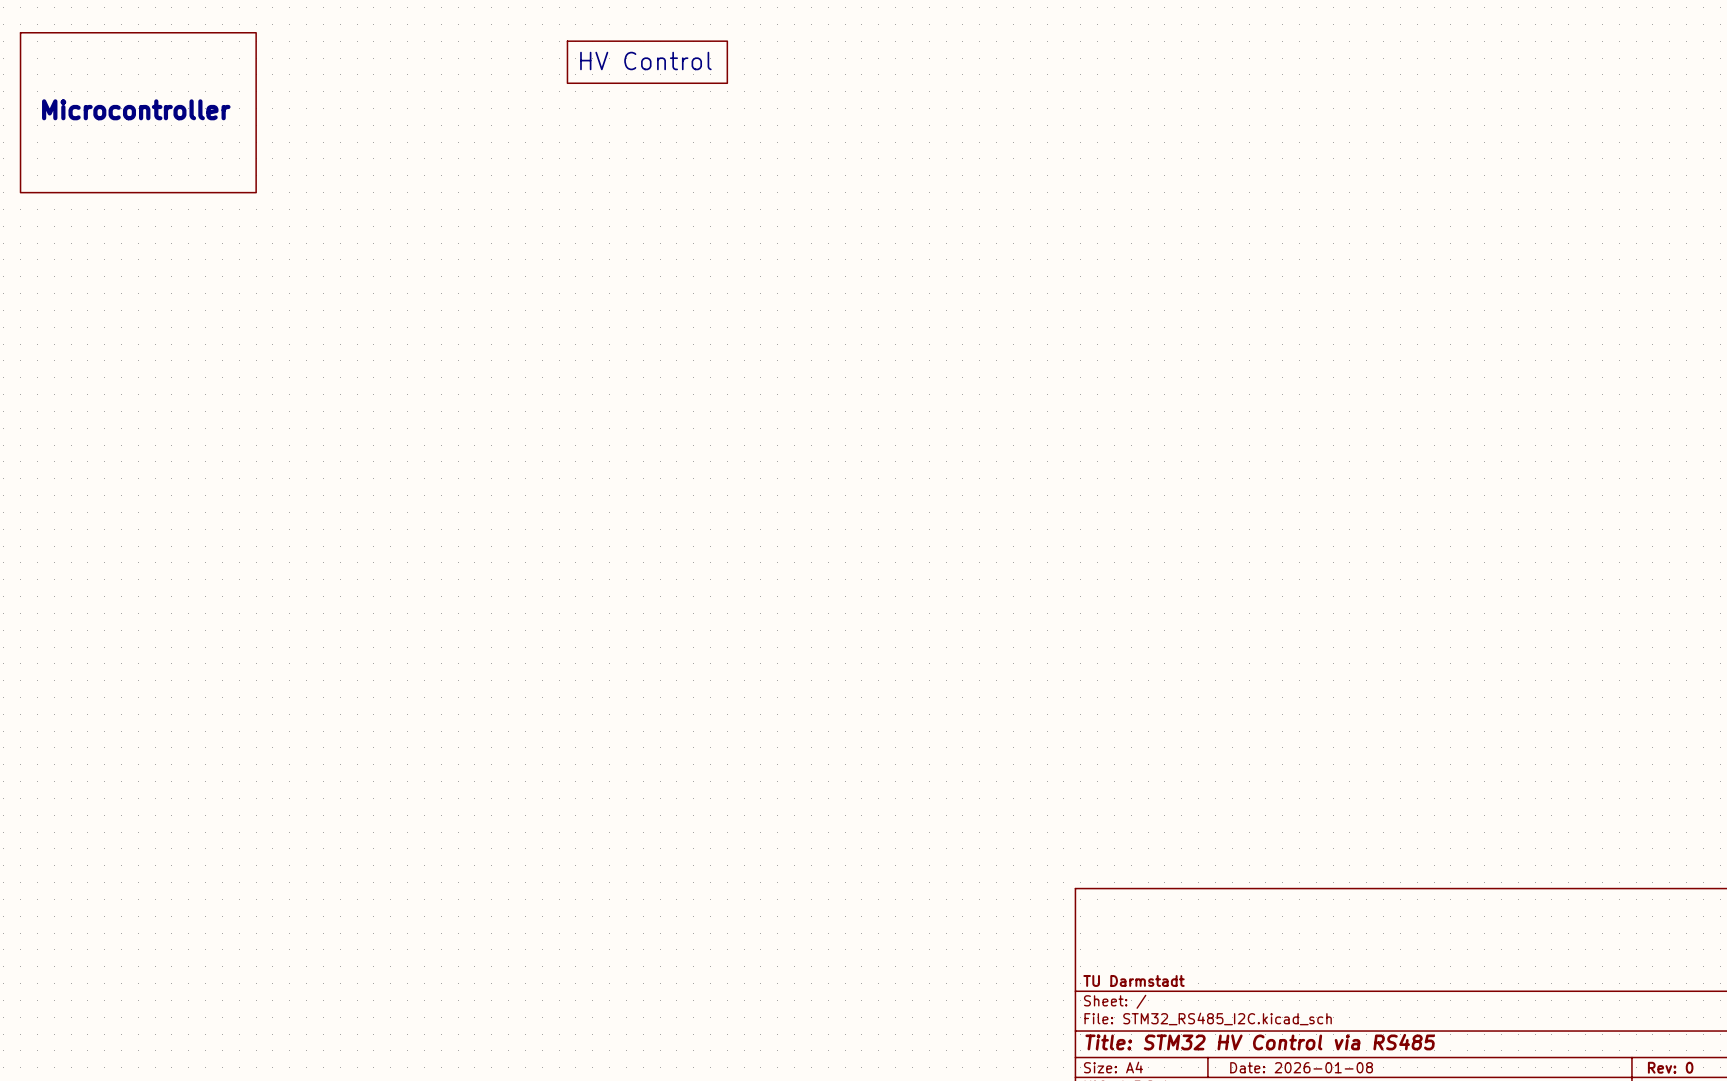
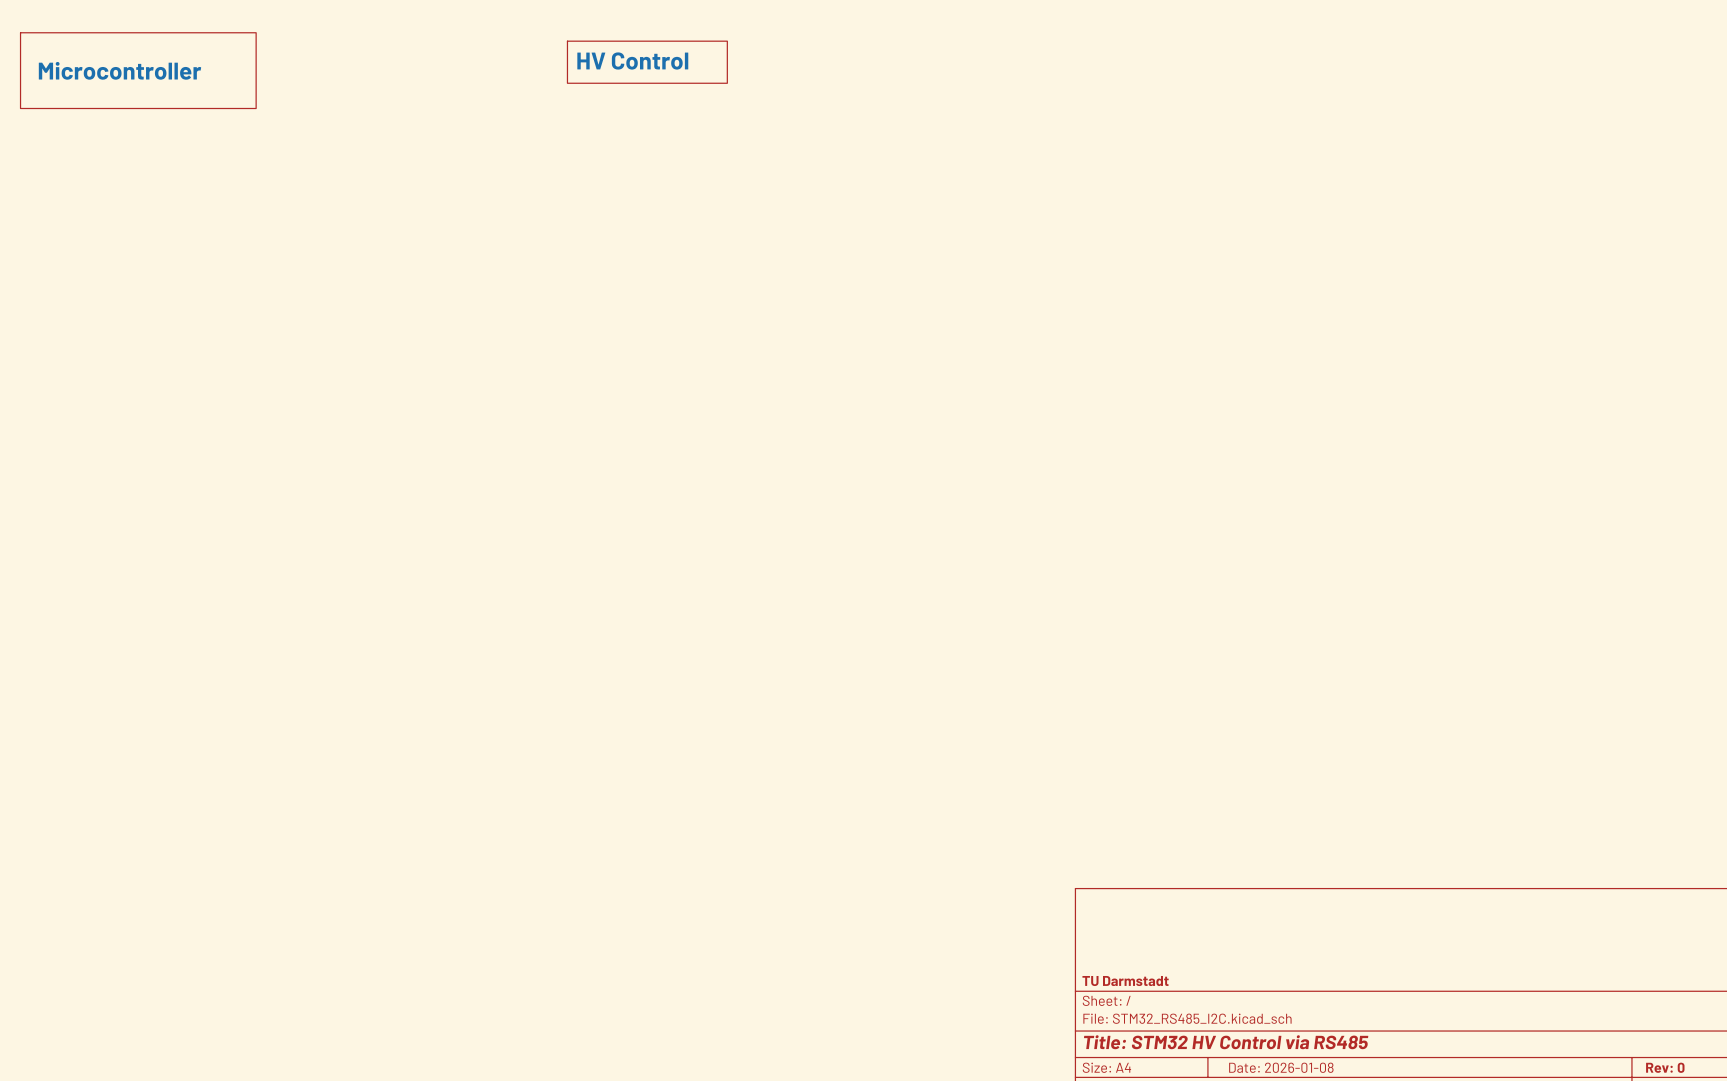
sheet Microcontroller: none -> (138, 70)
sheet Microcontroller: (138, 112) -> none

